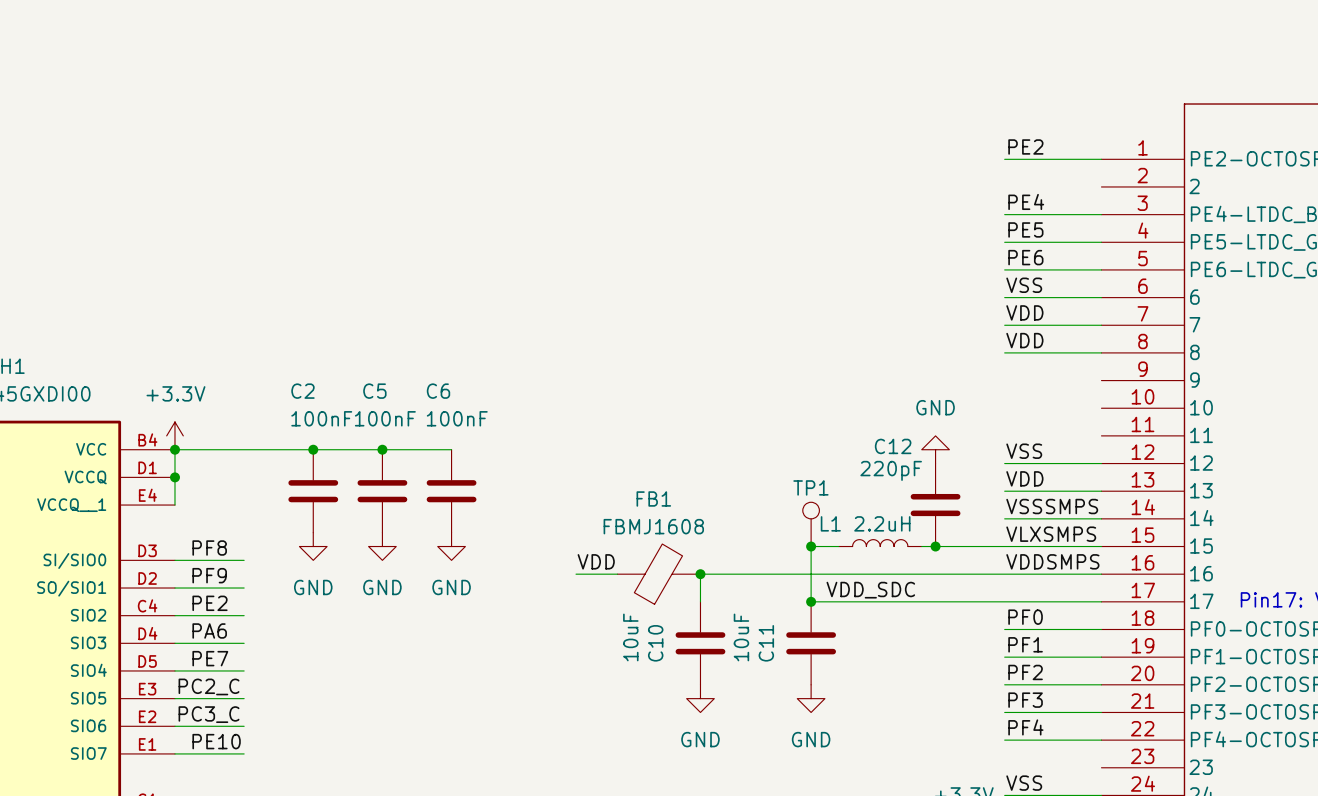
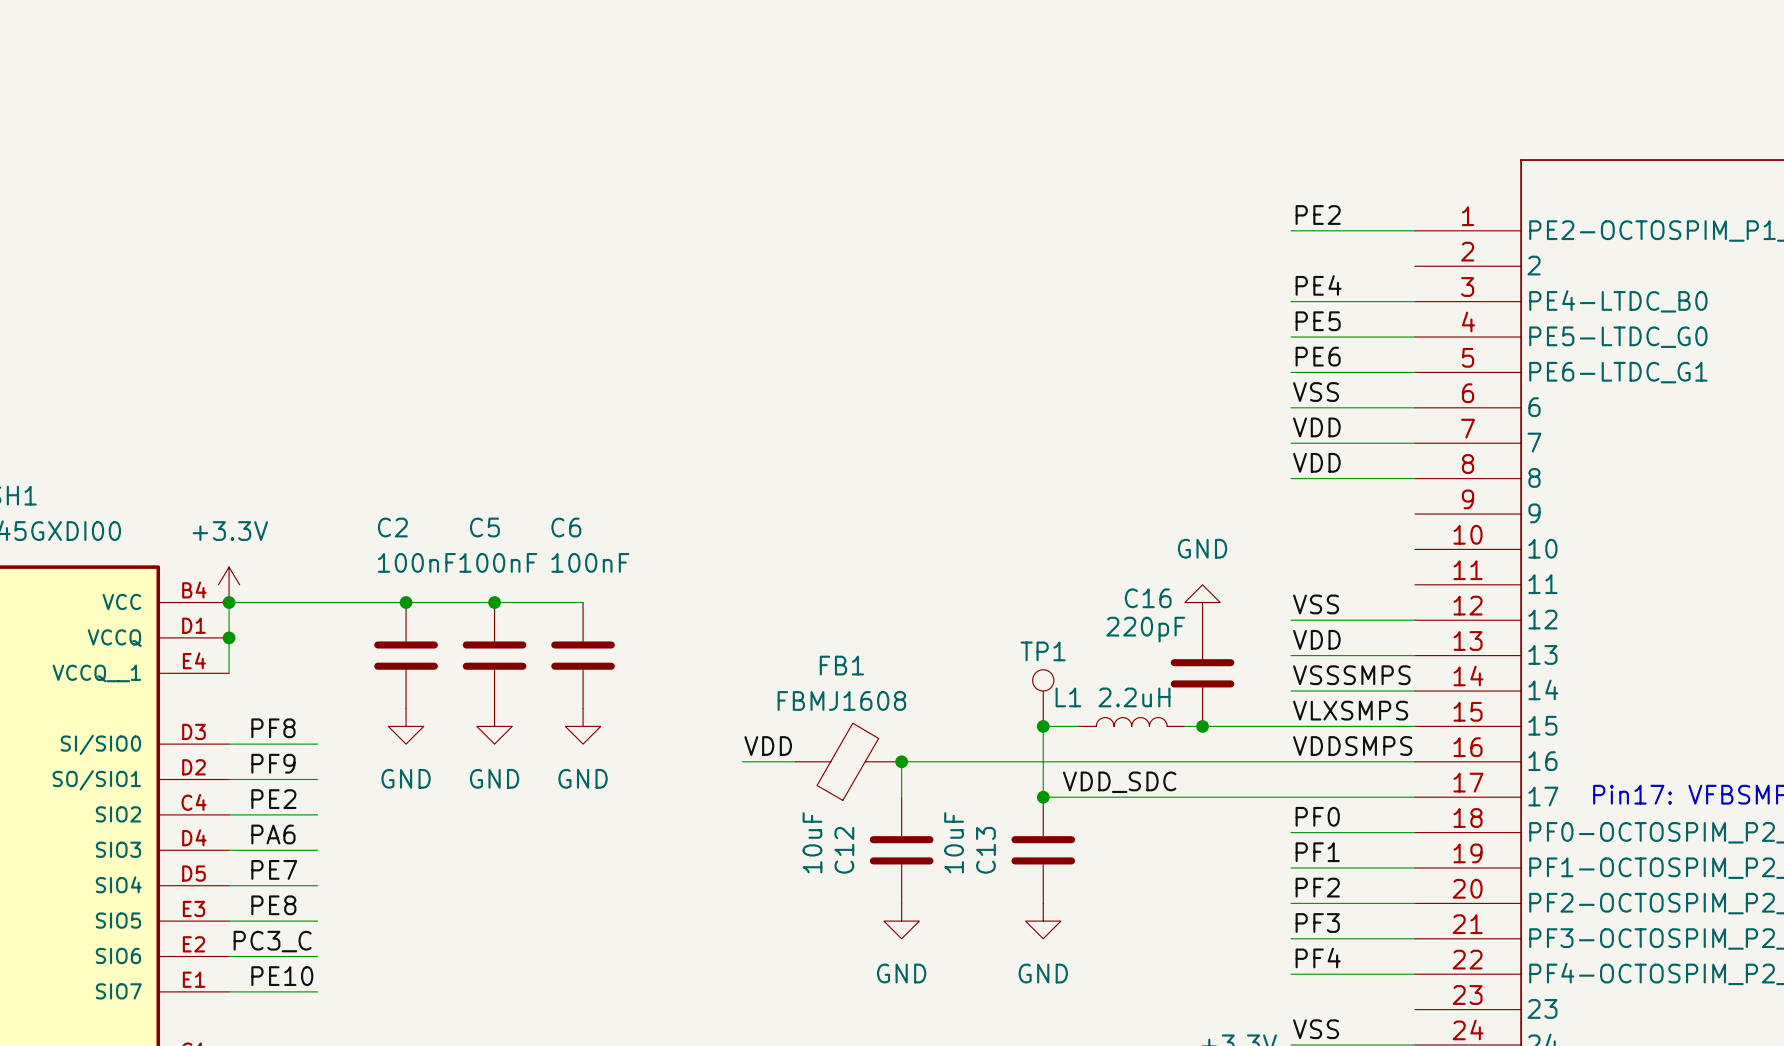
C12 name: C12 (893, 446) -> C16 (1148, 598)
C10 name: C10 (655, 643) -> C12 (844, 850)
C11 name: C11 (766, 643) -> C13 (985, 850)
label: PC2_C (209, 686) -> none
label: none -> PE8 (273, 905)

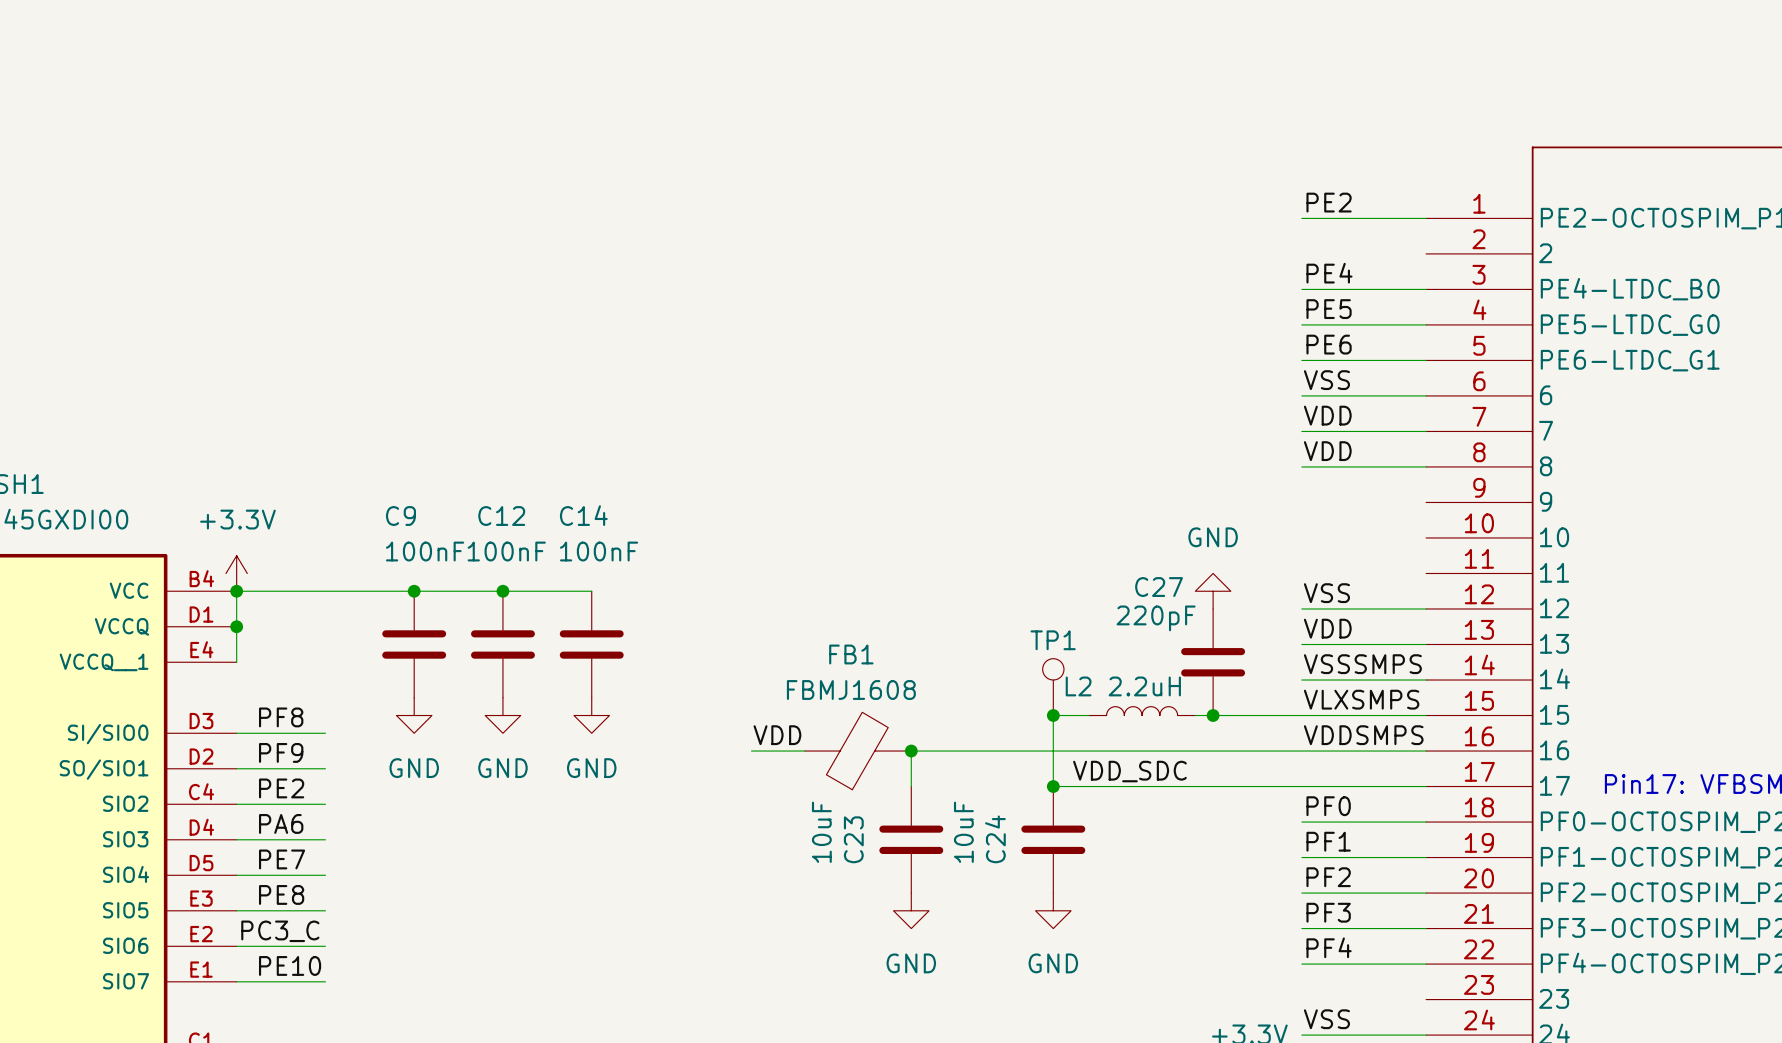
C2 name: C2 (392, 527) -> C9 (400, 516)
C5 name: C5 (484, 527) -> C12 (501, 516)
C6 name: C6 (566, 527) -> C14 (583, 515)
C16 name: C16 (1148, 598) -> C27 (1159, 587)
L1 name: L1 (1068, 697) -> L2 (1078, 686)
C12 name: C12 (844, 850) -> C23 (853, 839)
C13 name: C13 (985, 850) -> C24 (995, 839)

